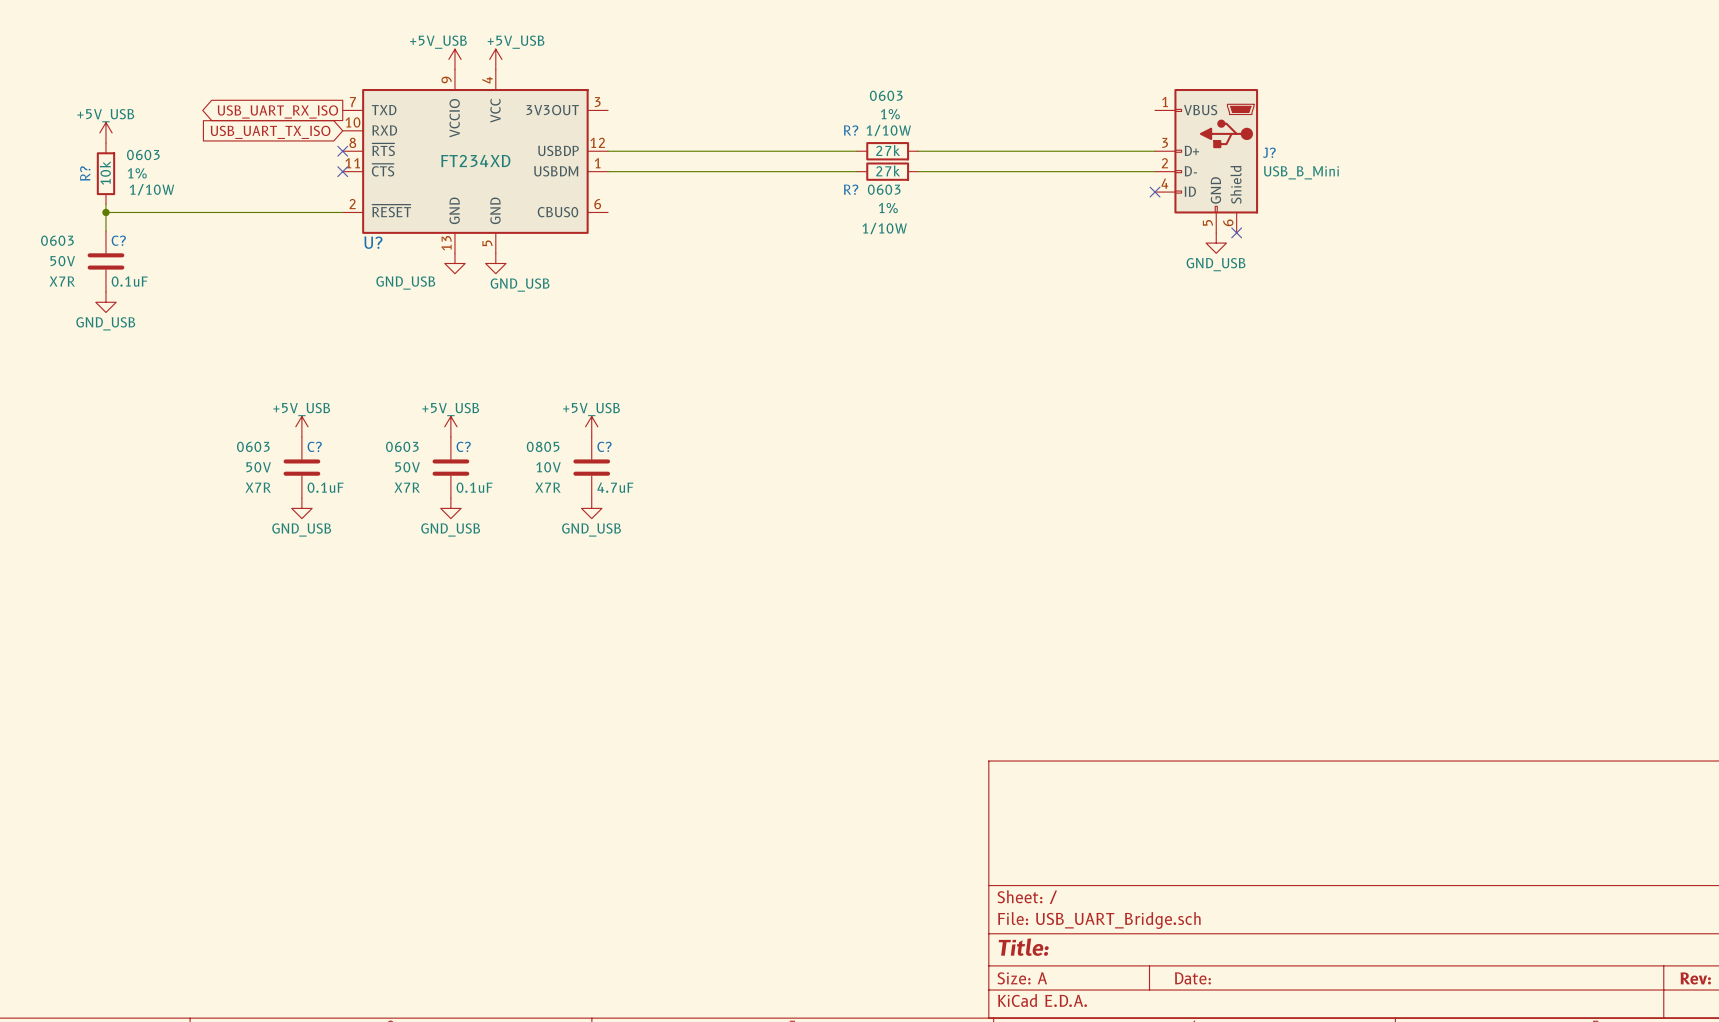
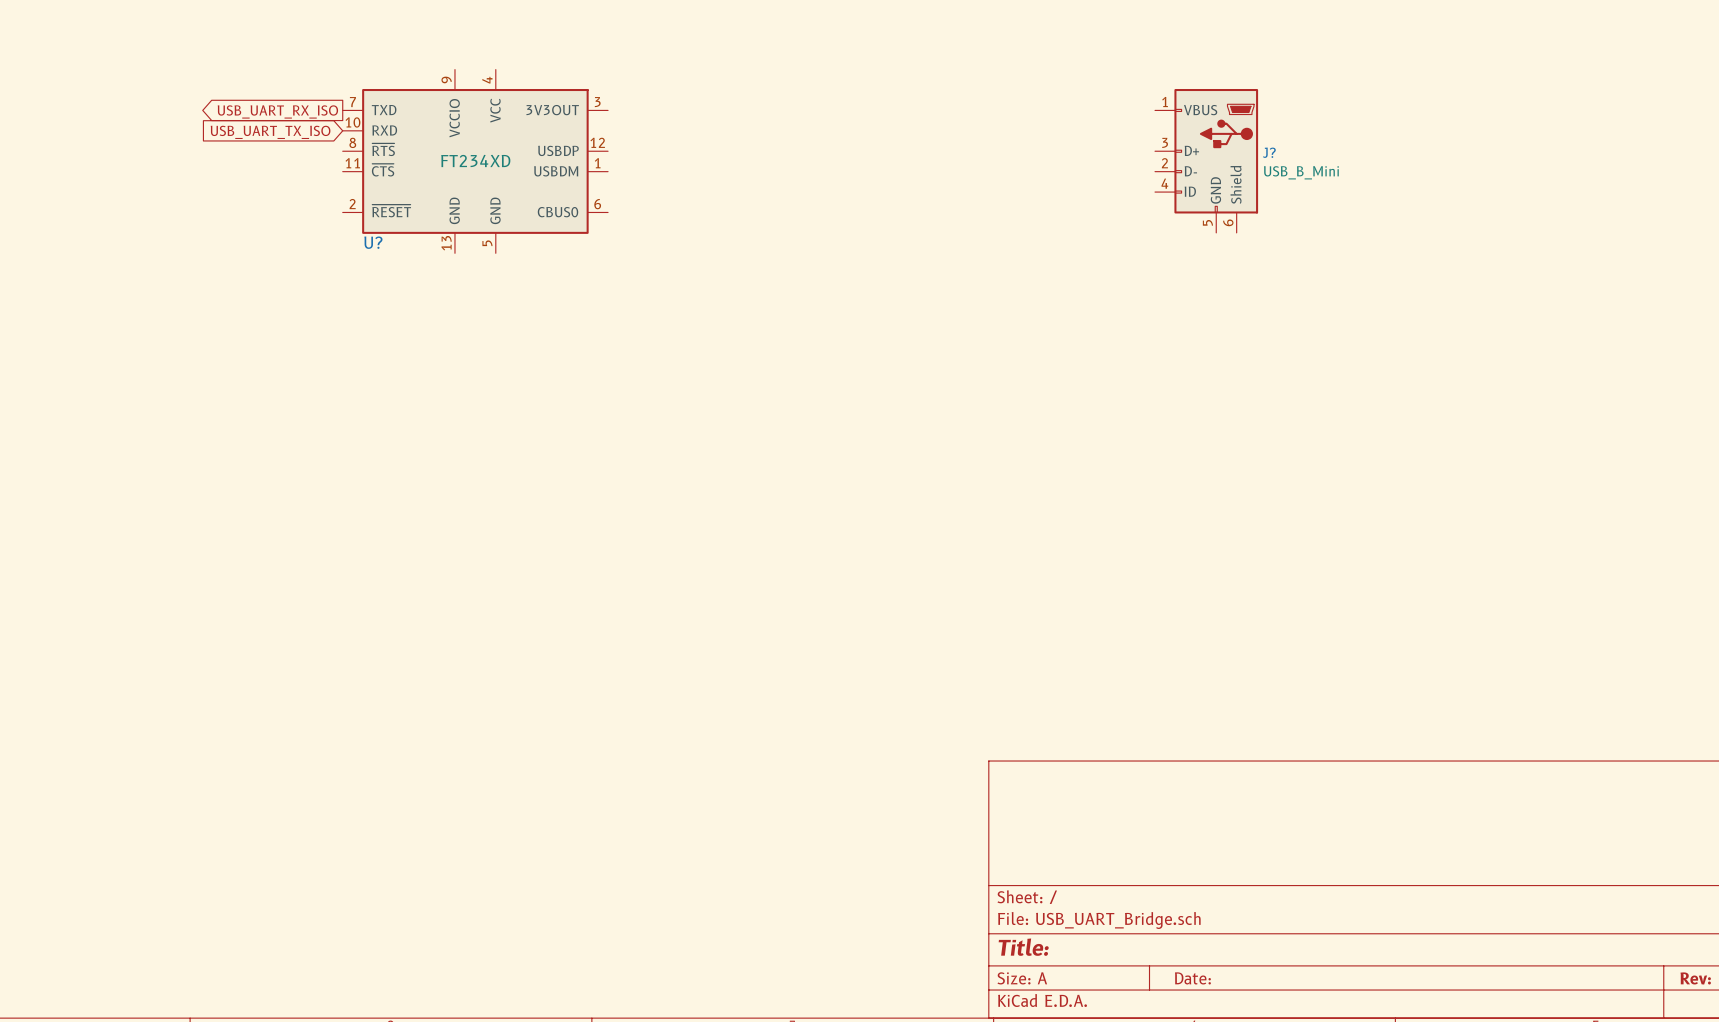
power symbol: +5V_USB (454, 59) -> none
power symbol: +5V_USB (495, 59) -> none
power symbol: +5V_USB (105, 132) -> none
no-connect mark: (342, 151) -> none
wire: (608, 151) (857, 151) -> none
R?: 27k (887, 151) -> none
wire: (918, 151) (1155, 151) -> none
no-connect mark: (342, 171) -> none
wire: (608, 171) (857, 171) -> none
R?: 27k (887, 171) -> none
wire: (918, 171) (1155, 171) -> none
R?: 10k (105, 173) -> none
no-connect mark: (1155, 192) -> none
wire: (105, 204) (105, 230) -> none
wire: (105, 212) (342, 212) -> none
junction: (105, 212) -> none
no-connect mark: (1236, 232) -> none
power symbol: GND_USB (1216, 243) -> none
C?: 0.1uF (105, 261) -> none
power symbol: GND_USB (454, 263) -> none
power symbol: GND_USB (495, 263) -> none
power symbol: GND_USB (105, 302) -> none
power symbol: +5V_USB (301, 426) -> none
power symbol: +5V_USB (450, 426) -> none
power symbol: +5V_USB (591, 426) -> none
C?: 0.1uF (301, 467) -> none
C?: 0.1uF (450, 467) -> none
C?: 4.7uF (591, 467) -> none
power symbol: GND_USB (301, 508) -> none
power symbol: GND_USB (450, 508) -> none
power symbol: GND_USB (591, 508) -> none

